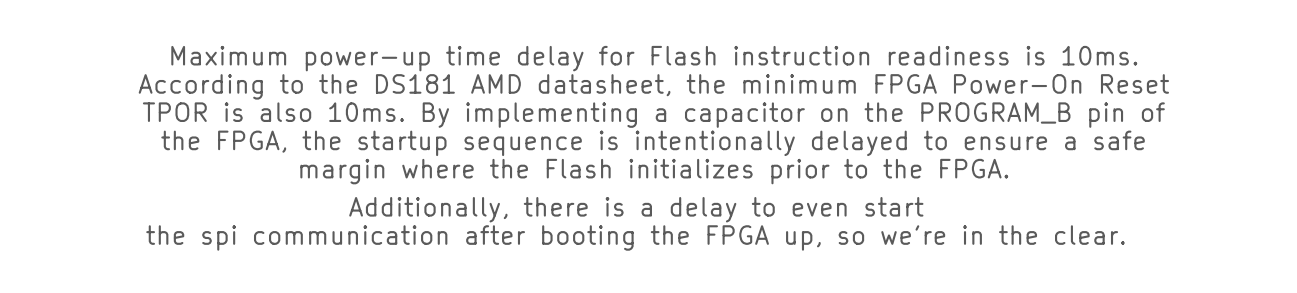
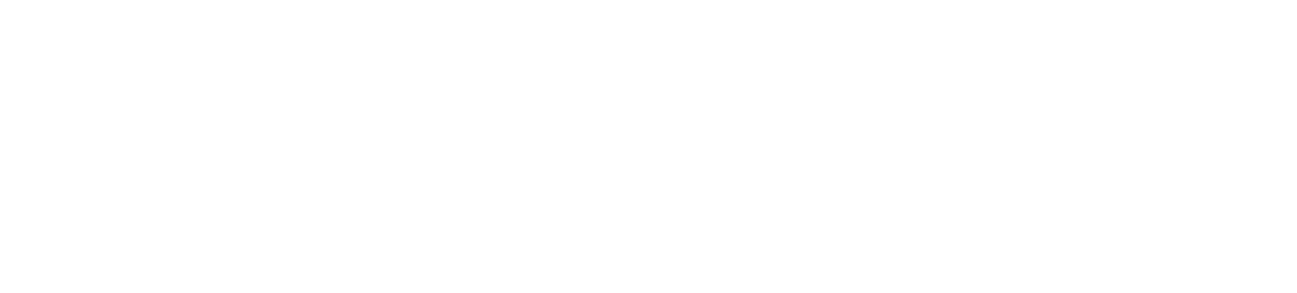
text: Maximum power-up time delay for Flash instruction readiness is 10ms. (654, 58) -> none
text: According to the DS181 AMD datasheet, the minimum FPGA Power-On Reset (653, 86) -> none
text: TPOR is also 10ms. By implementing a capacitor on the PROGRAM_B pin of (653, 115) -> none
text: the FPGA, the startup sequence is intentionally delayed to ensure a safe (653, 143) -> none
text: margin where the Flash initializes prior to the FPGA. (654, 171) -> none
text: Additionally, there is a delay to even start (636, 209) -> none
text: the spi communication after booting the FPGA up, so we're in the clear. (635, 237) -> none

